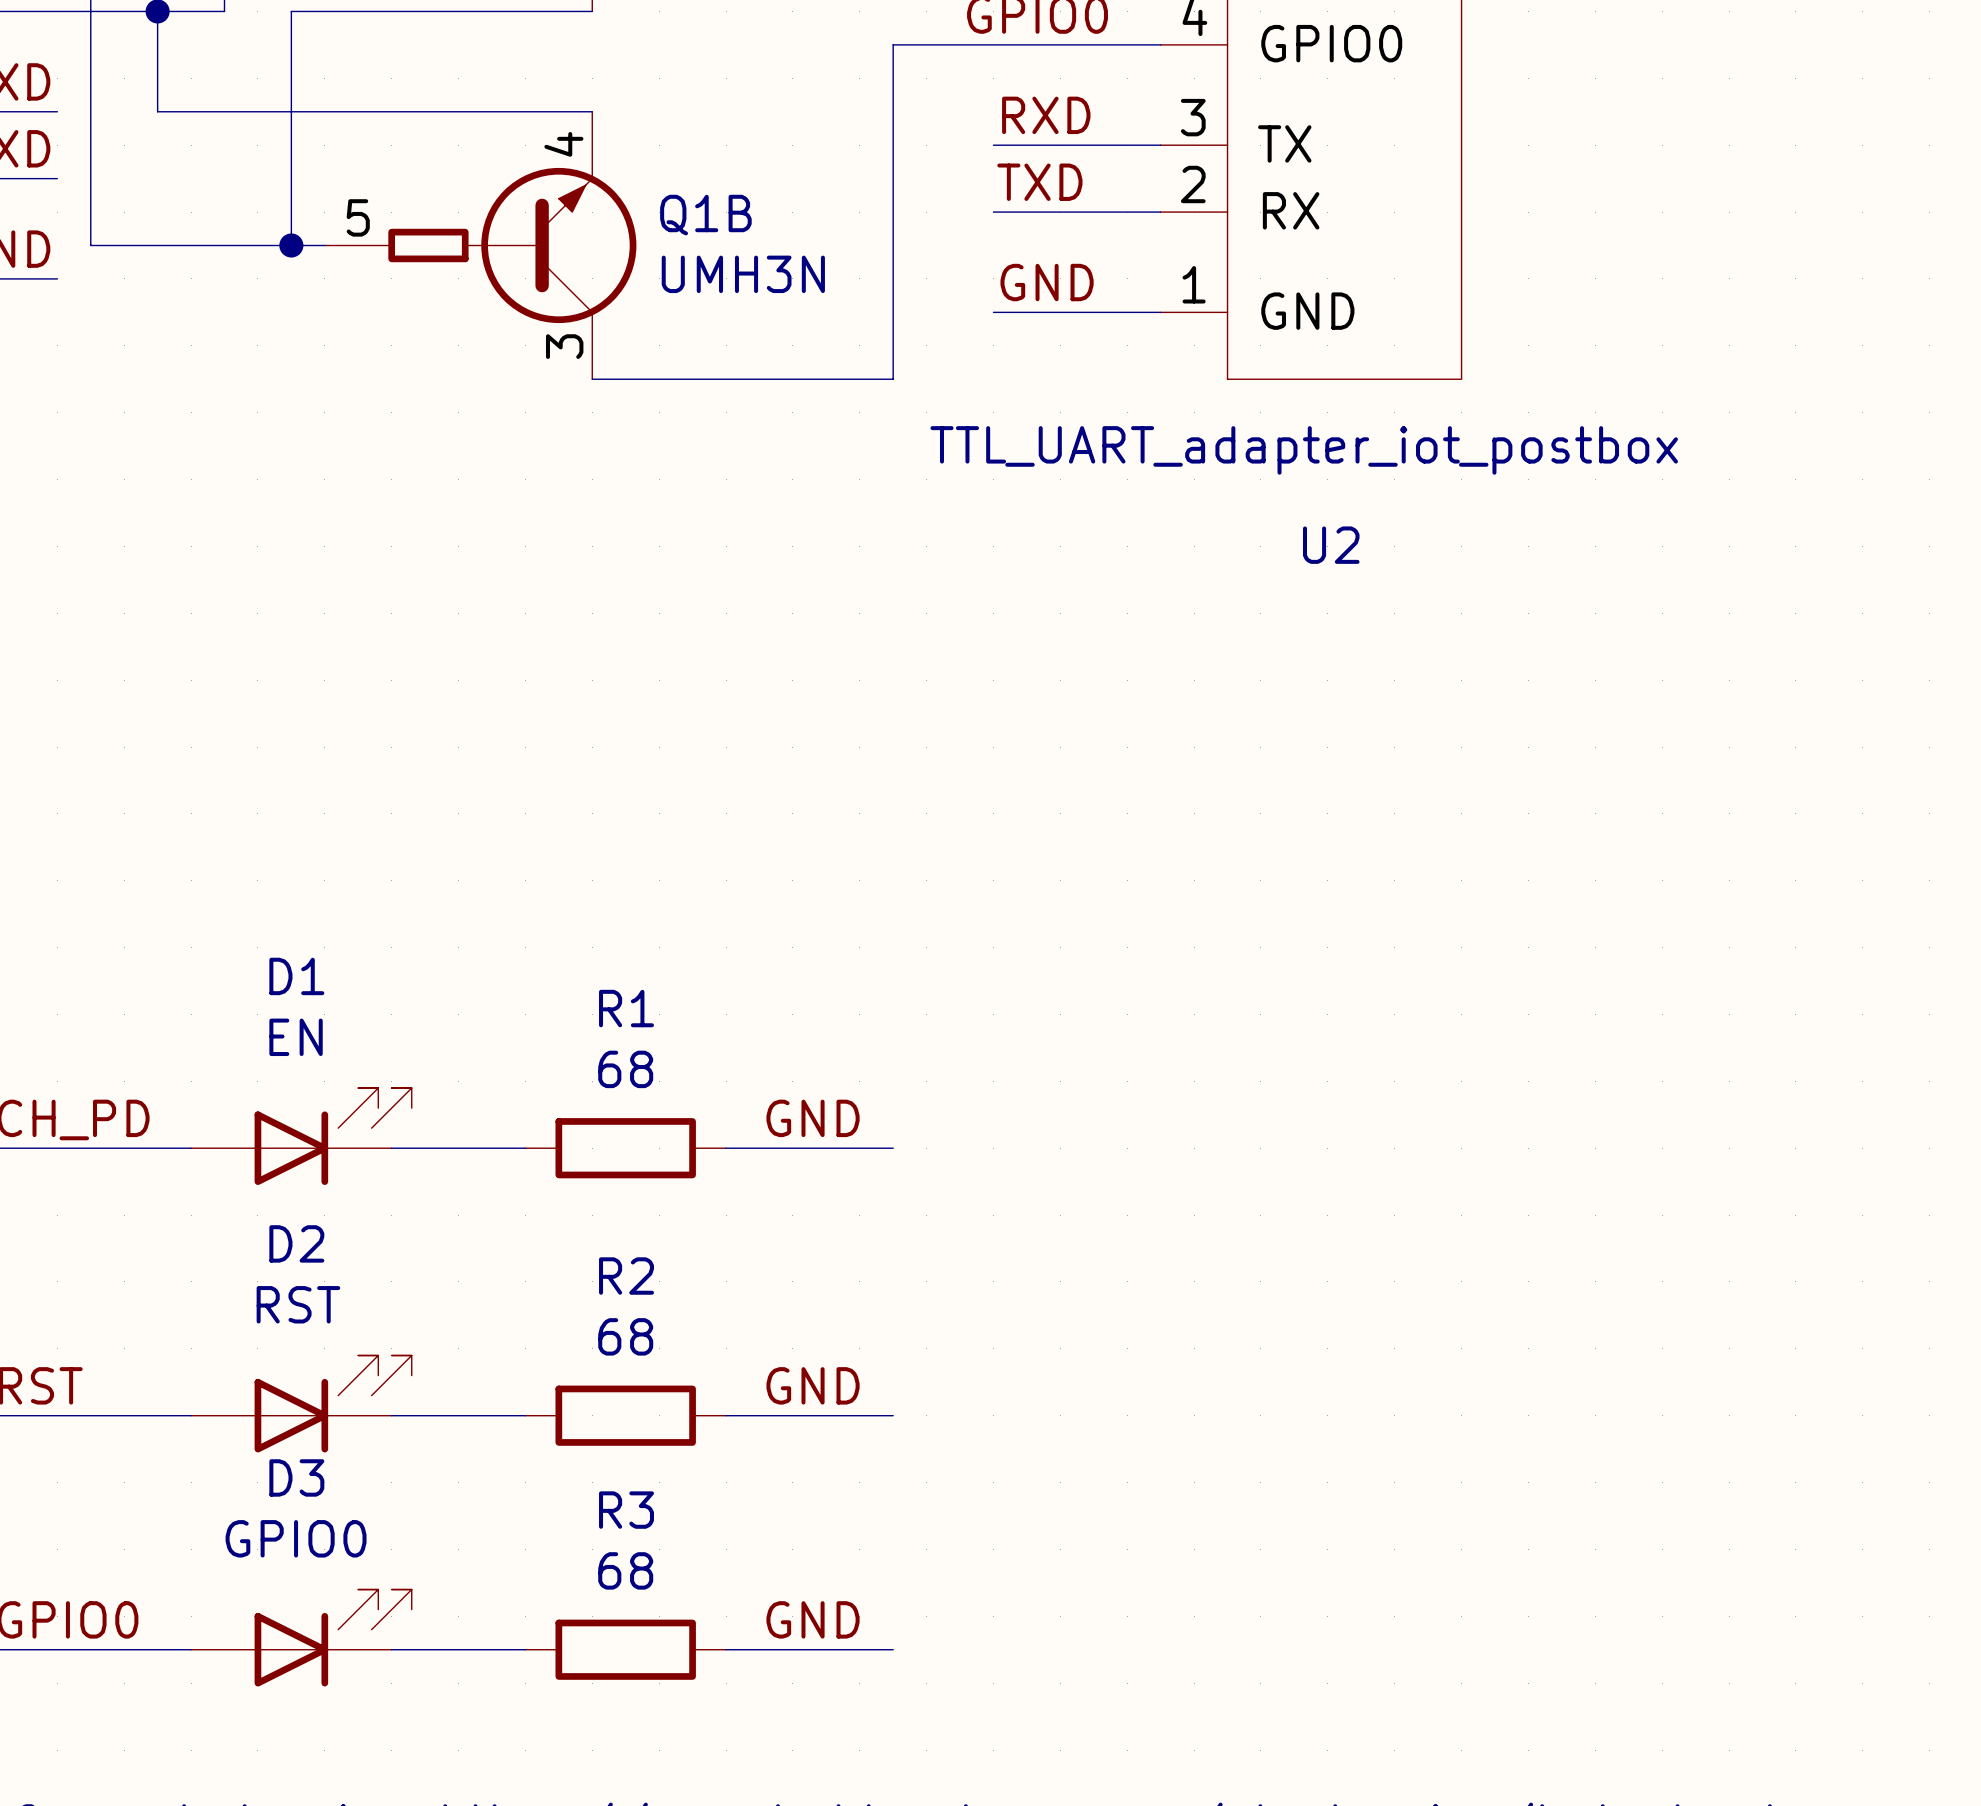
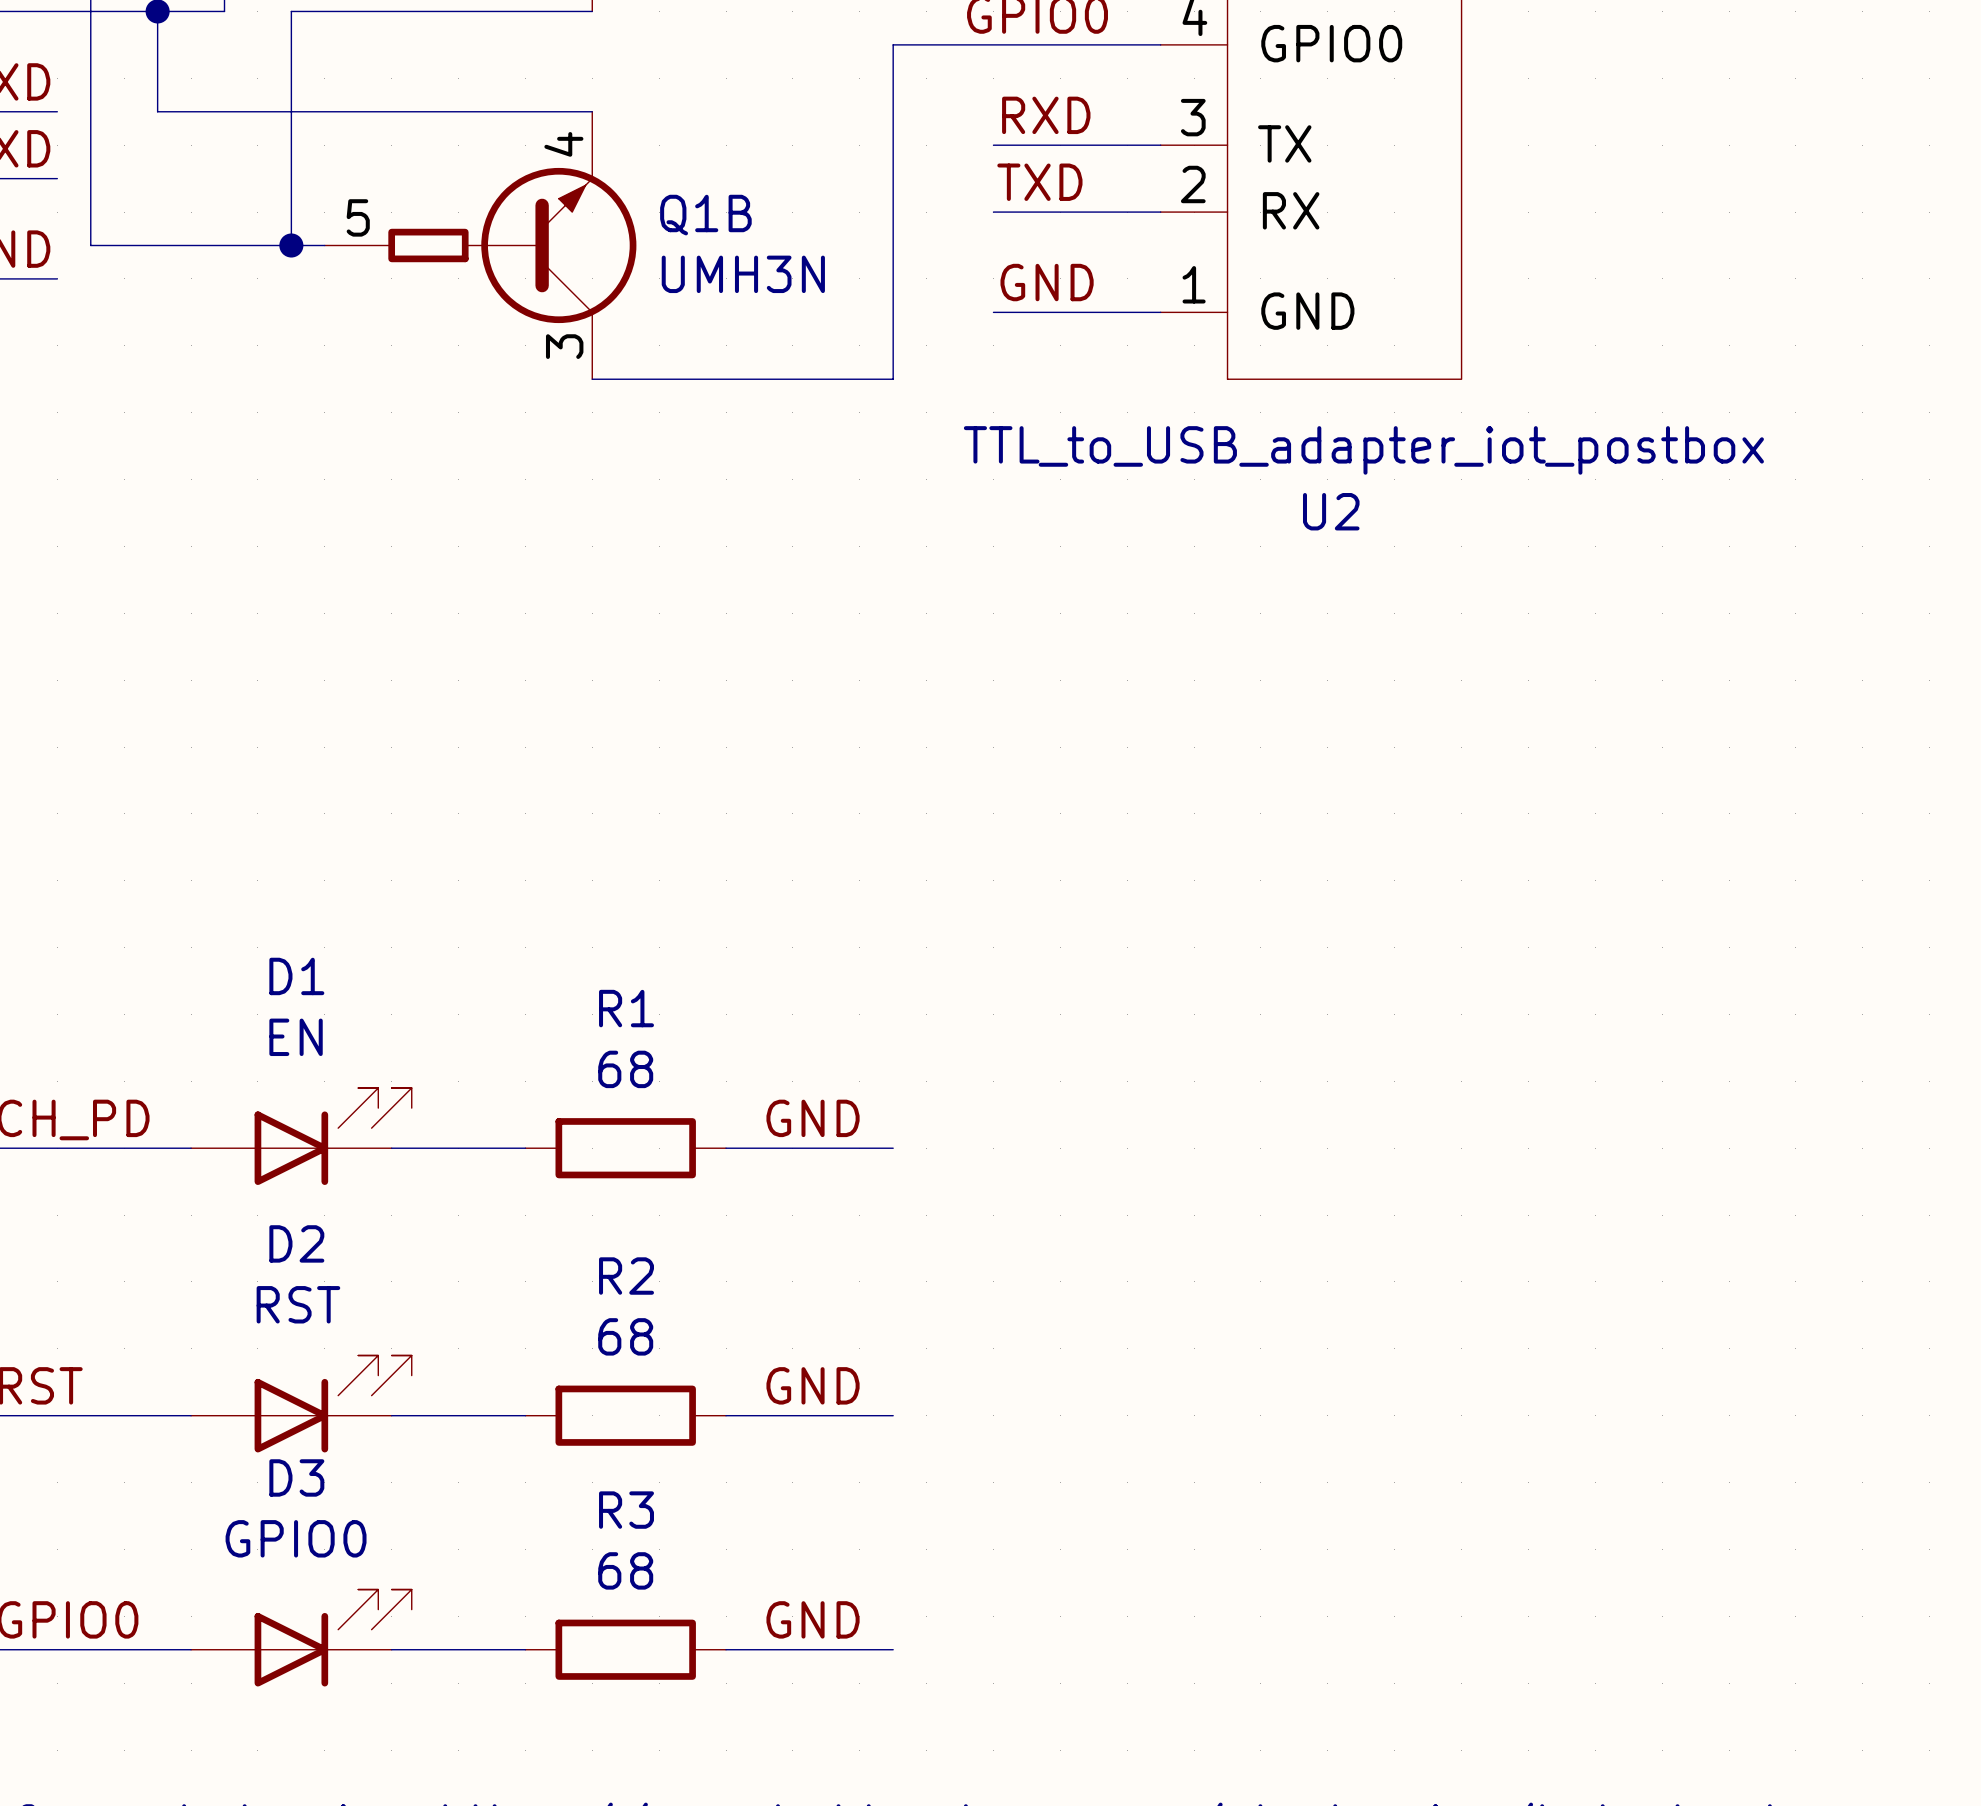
U2 value: TTL_UART_adapter_iot_postbox (1304, 450) -> TTL_to_USB_adapter_iot_postbox (1363, 450)
U2 name position: U2 (1331, 545) -> U2 (1331, 511)

